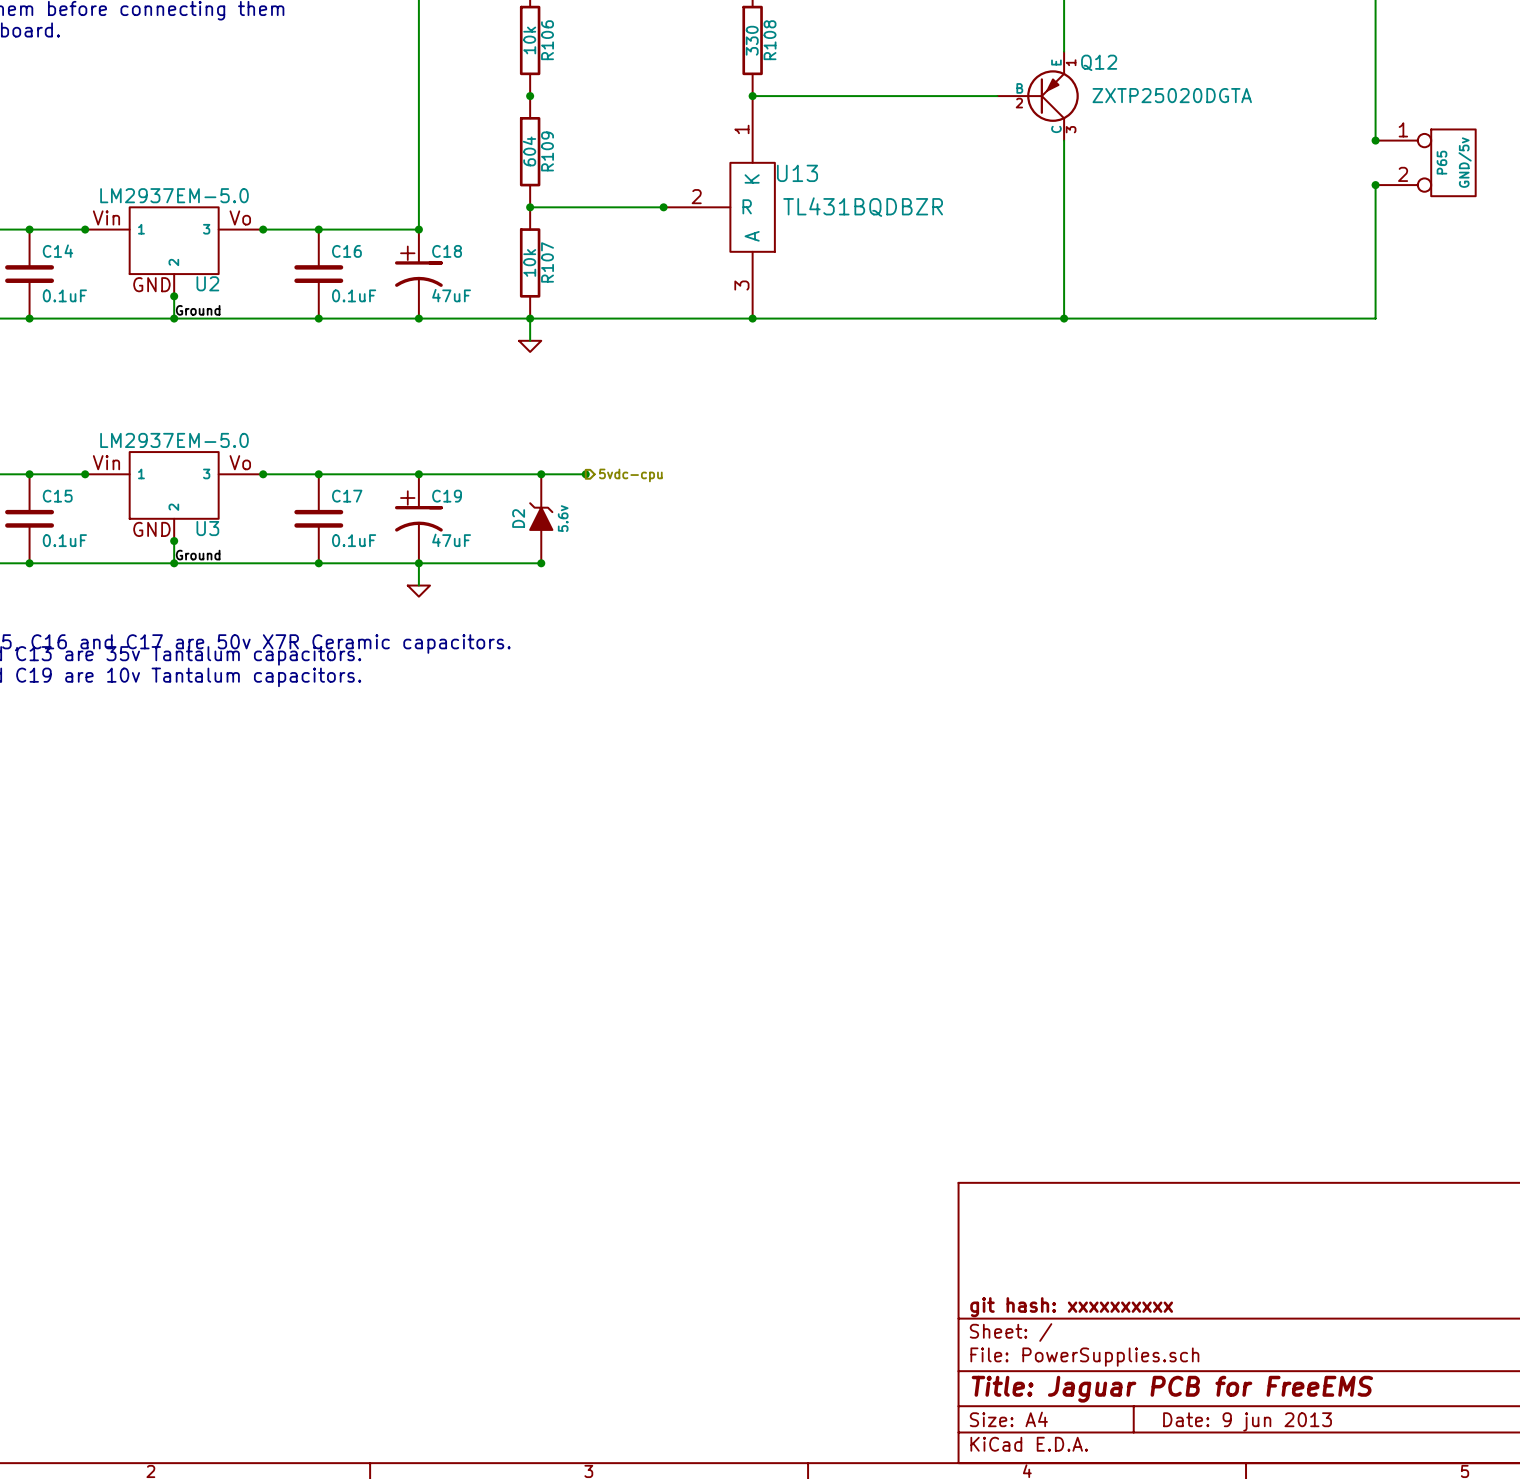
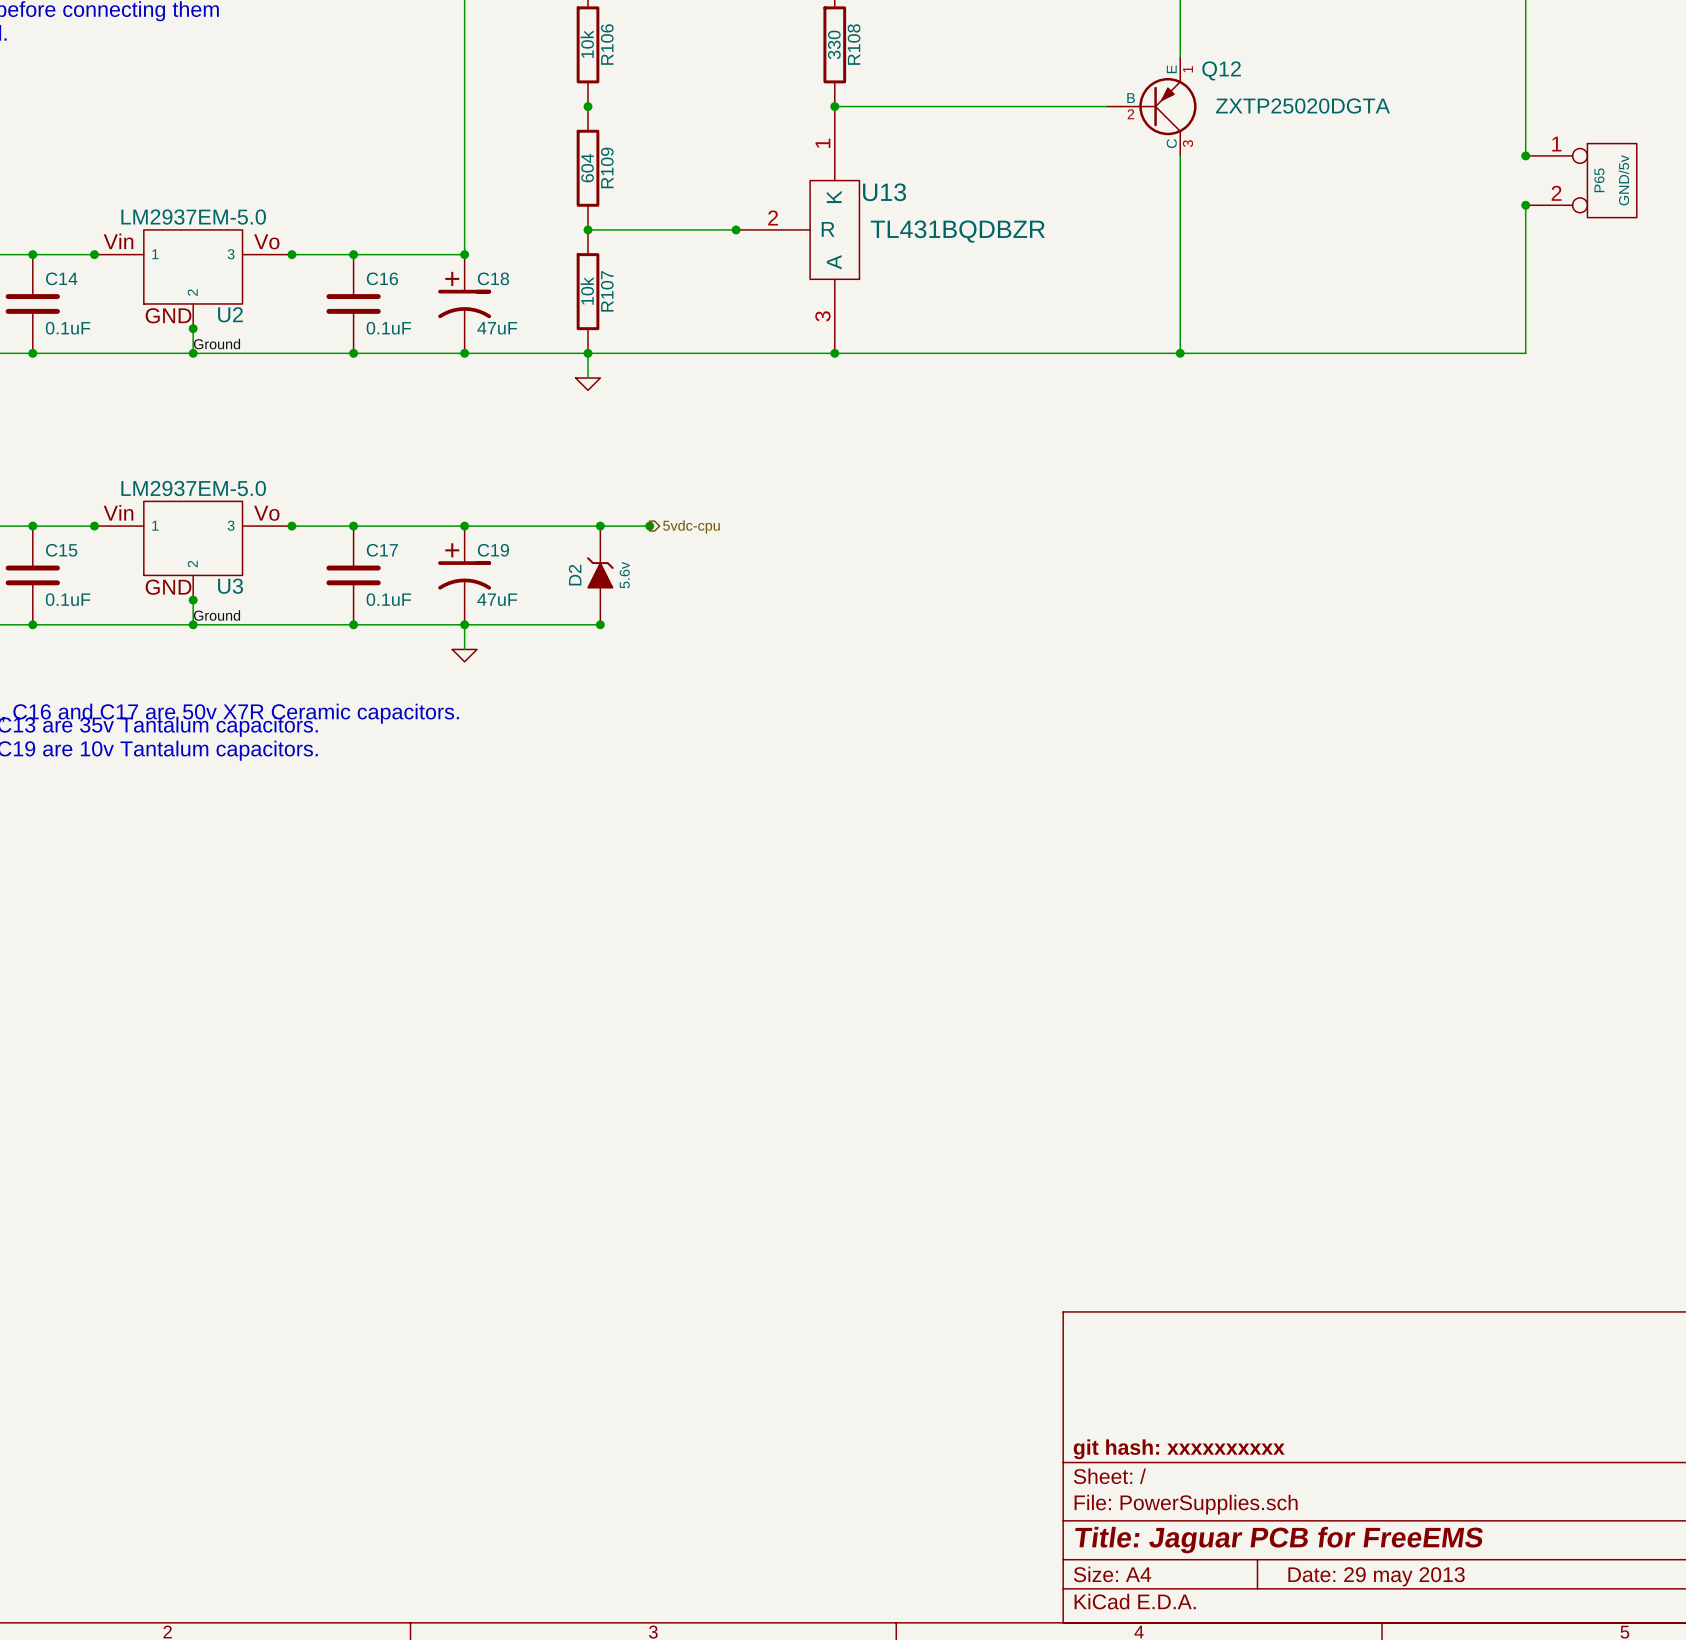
title block: Date: 9 jun 2013 (1247, 1421) -> Date: 29 may 2013 (1376, 1576)

